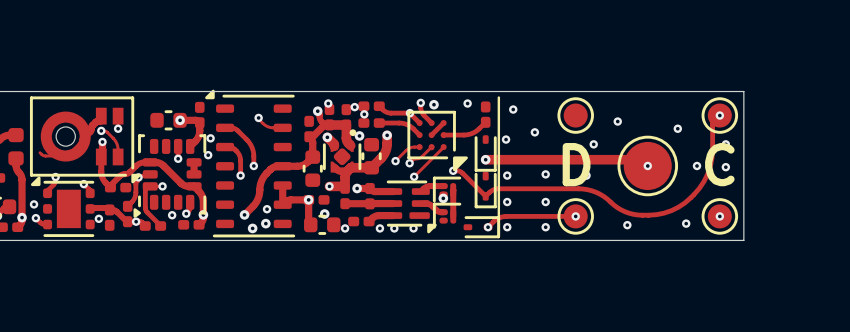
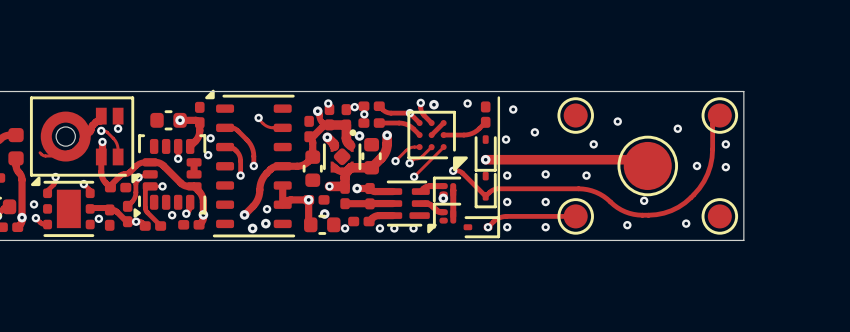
via: (719, 115) -> none
text: D (576, 164) -> none
text: C (719, 164) -> none
via: (647, 165) -> none
via: none -> (644, 200)
via: (575, 216) -> none
via: (719, 216) -> none

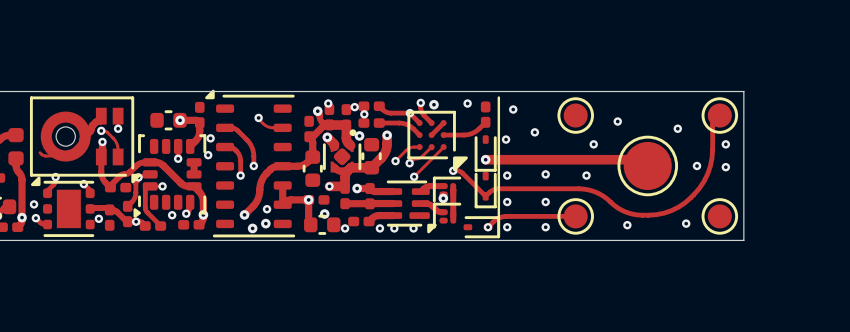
via: (644, 200) -> none

